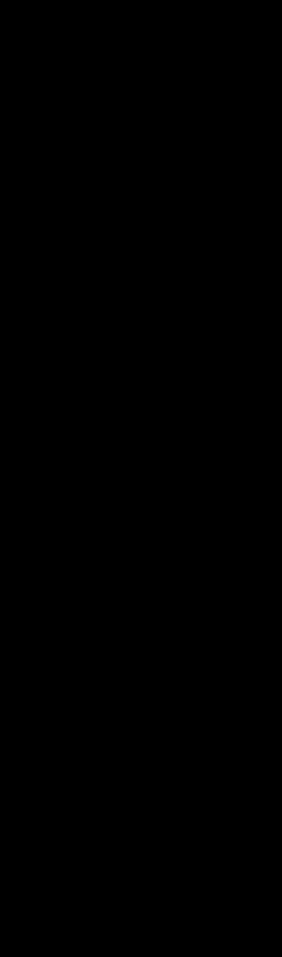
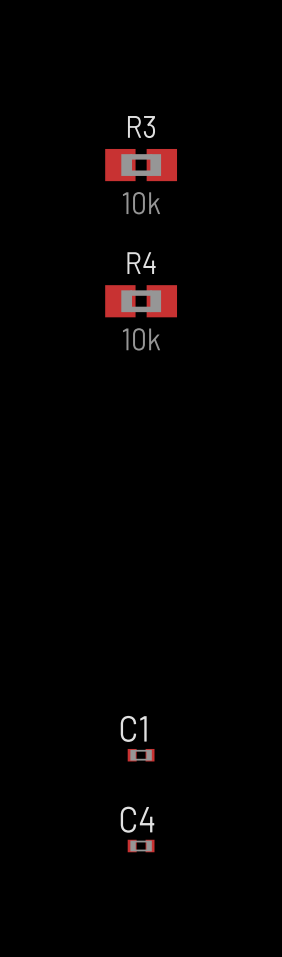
R3: none -> 10k (141, 165)
R4: none -> 10k (141, 301)
C1: none -> (141, 755)
C4: none -> (141, 846)

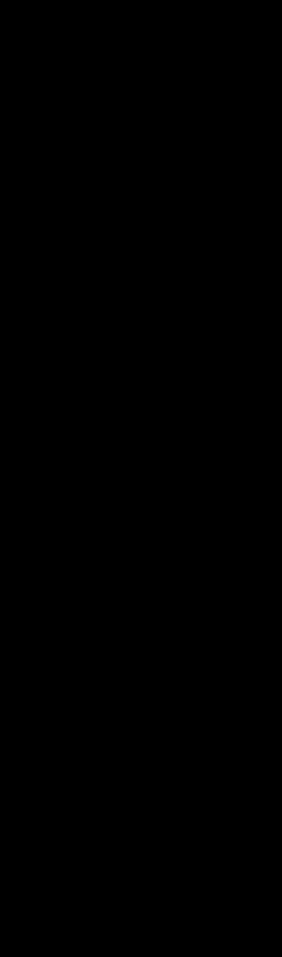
R3: 10k (141, 165) -> none
R4: 10k (141, 301) -> none
C1: (141, 755) -> none
C4: (141, 846) -> none

